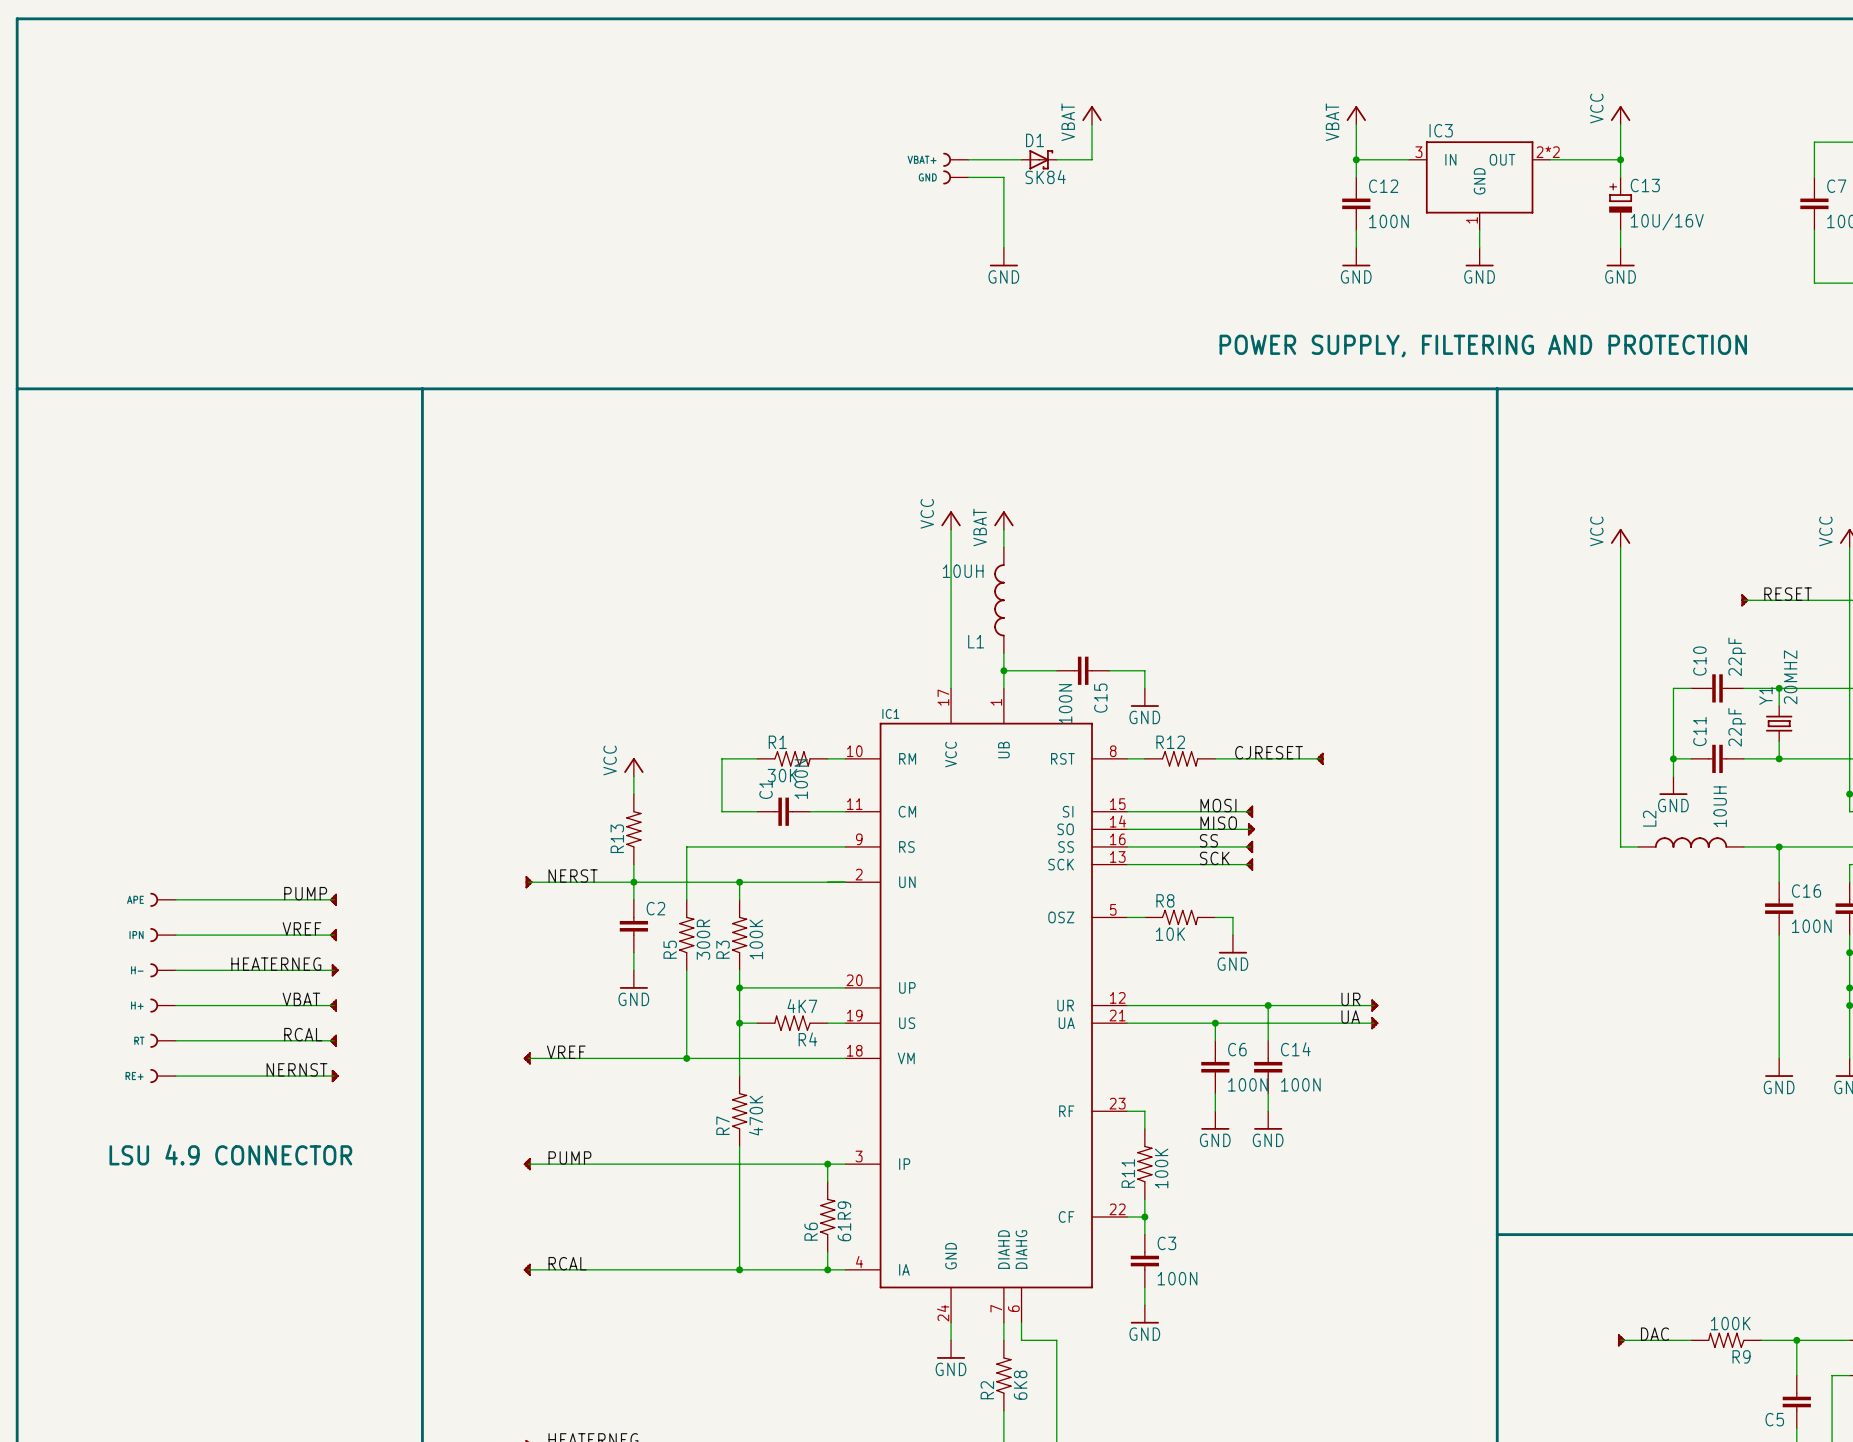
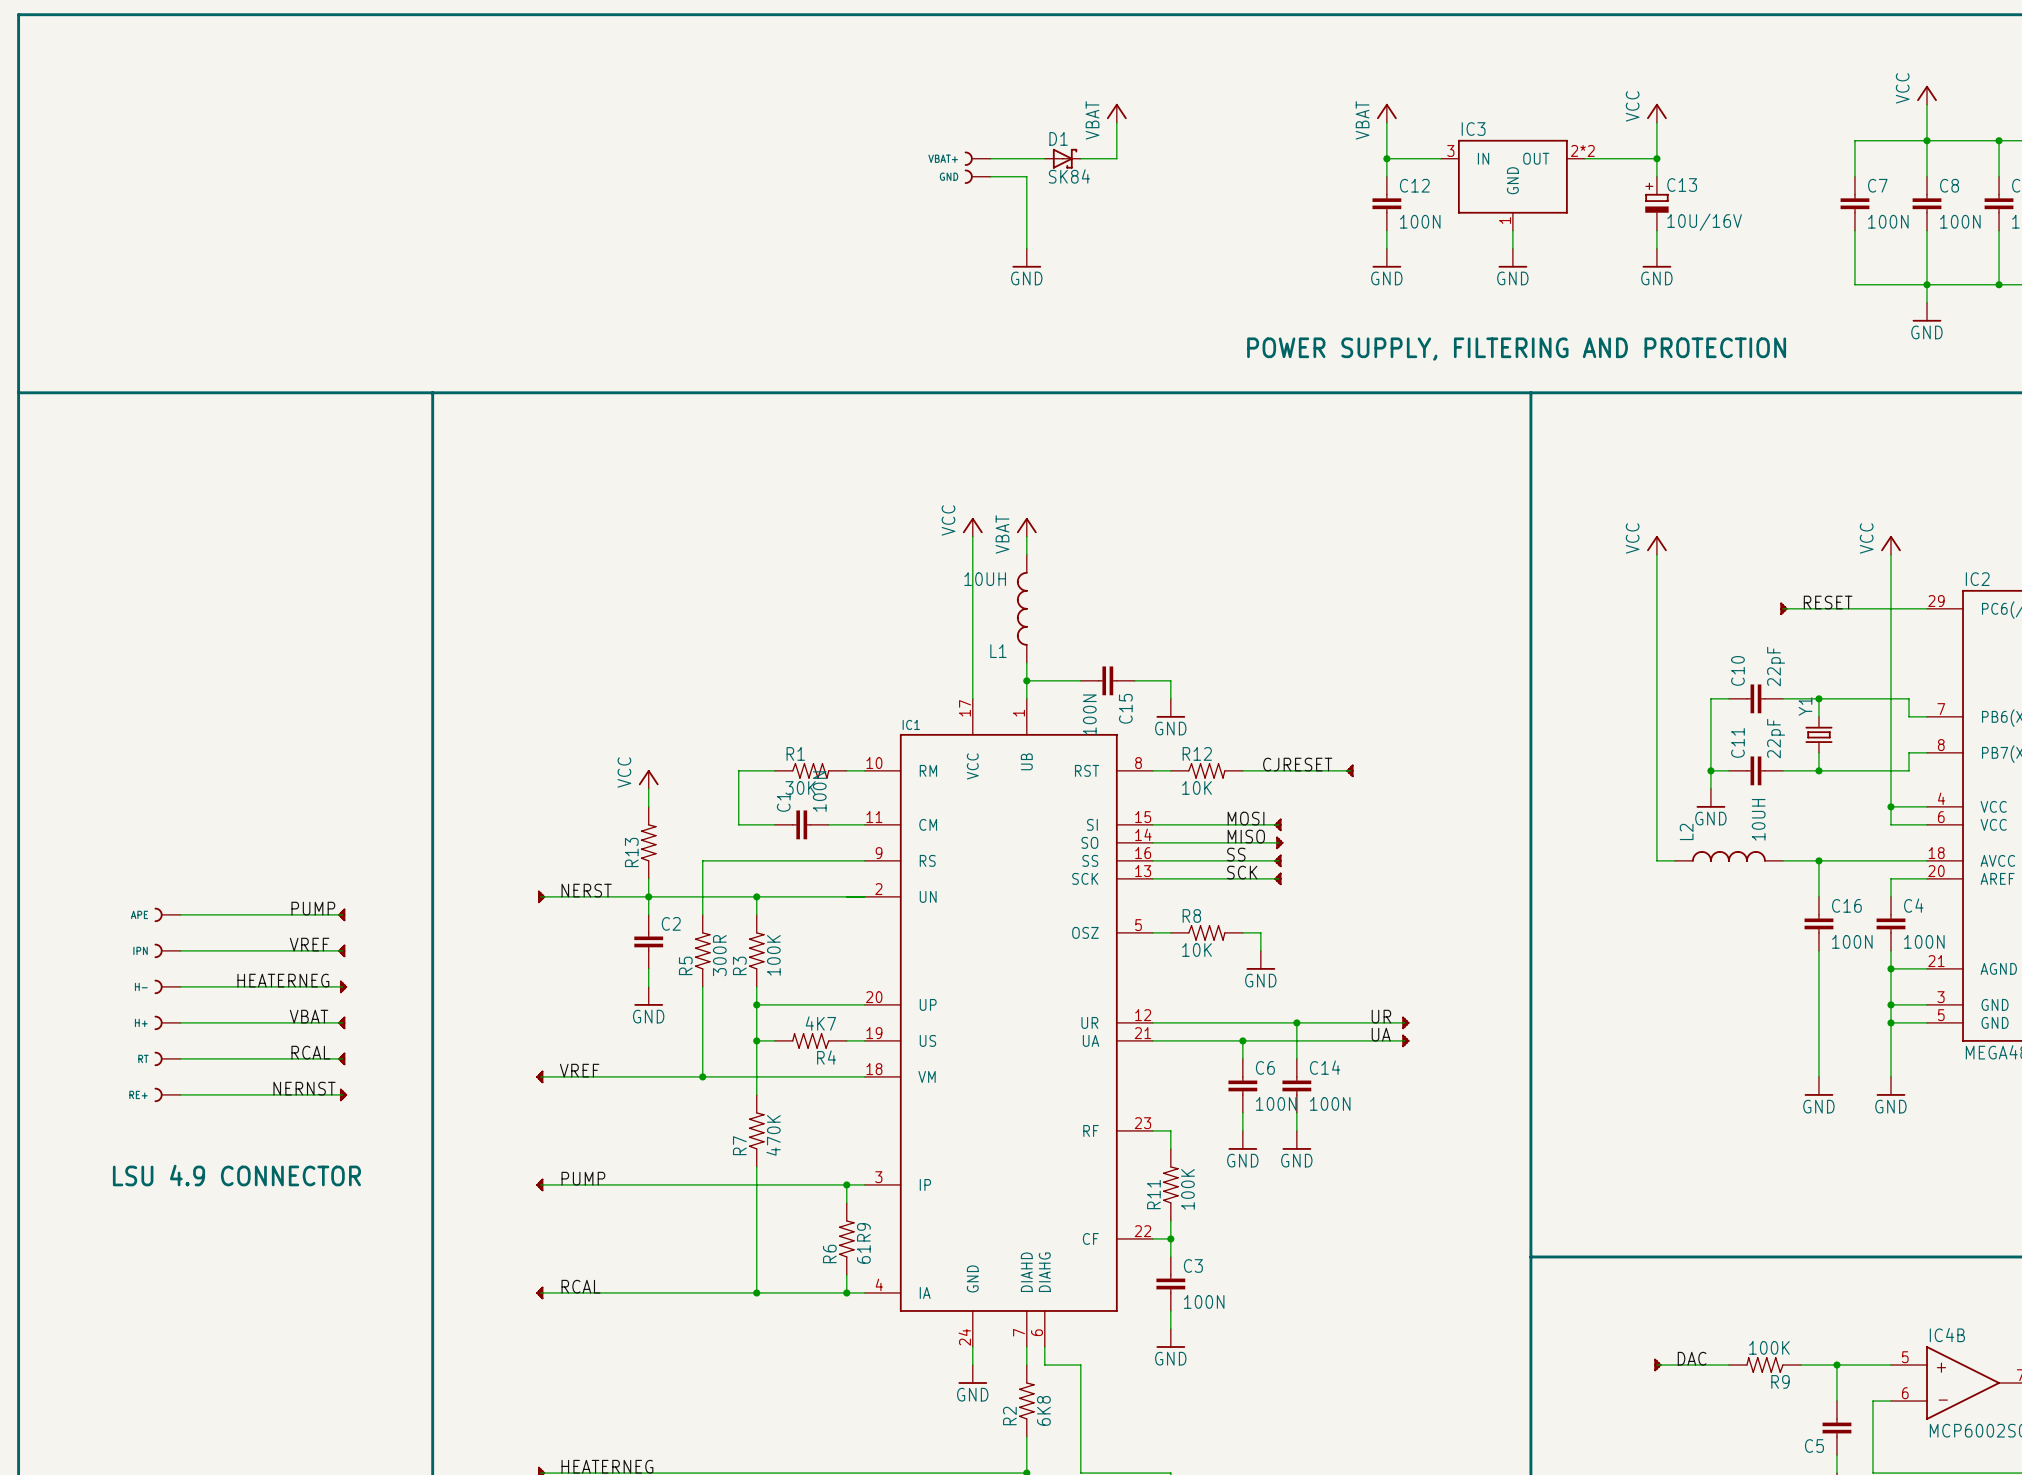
Y1 value: 20MHZ (1790, 677) -> none
R12 value: none -> 10K (1196, 787)

